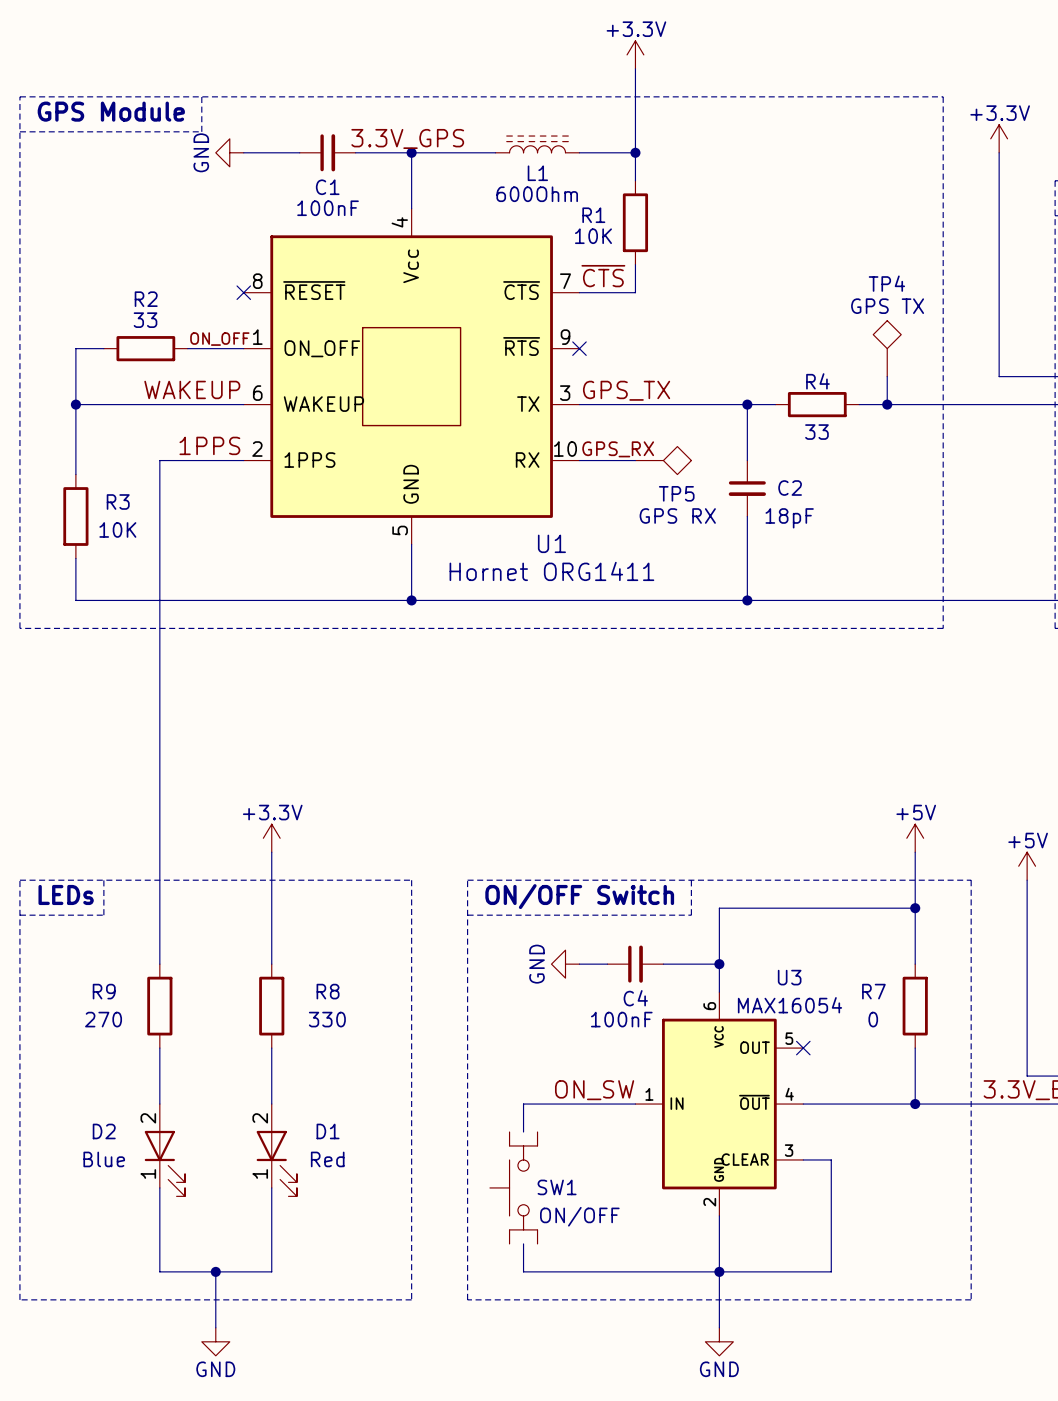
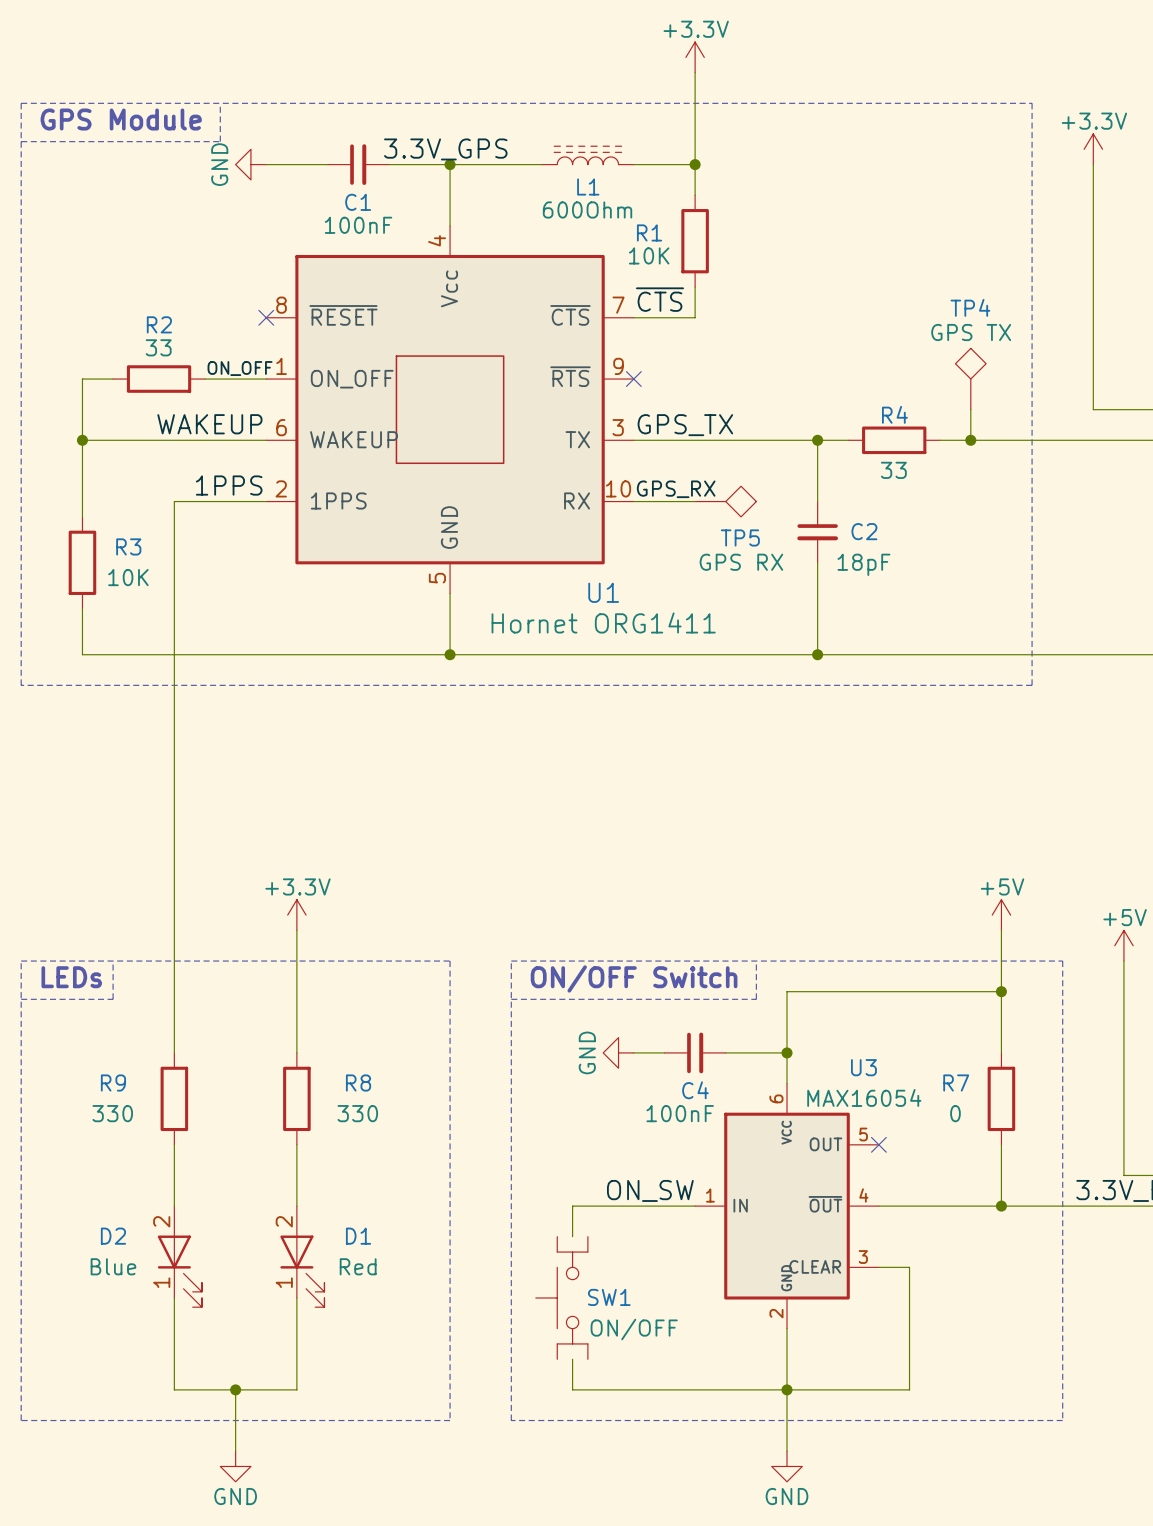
R9 value: 270 (103, 1019) -> 330 (112, 1113)

